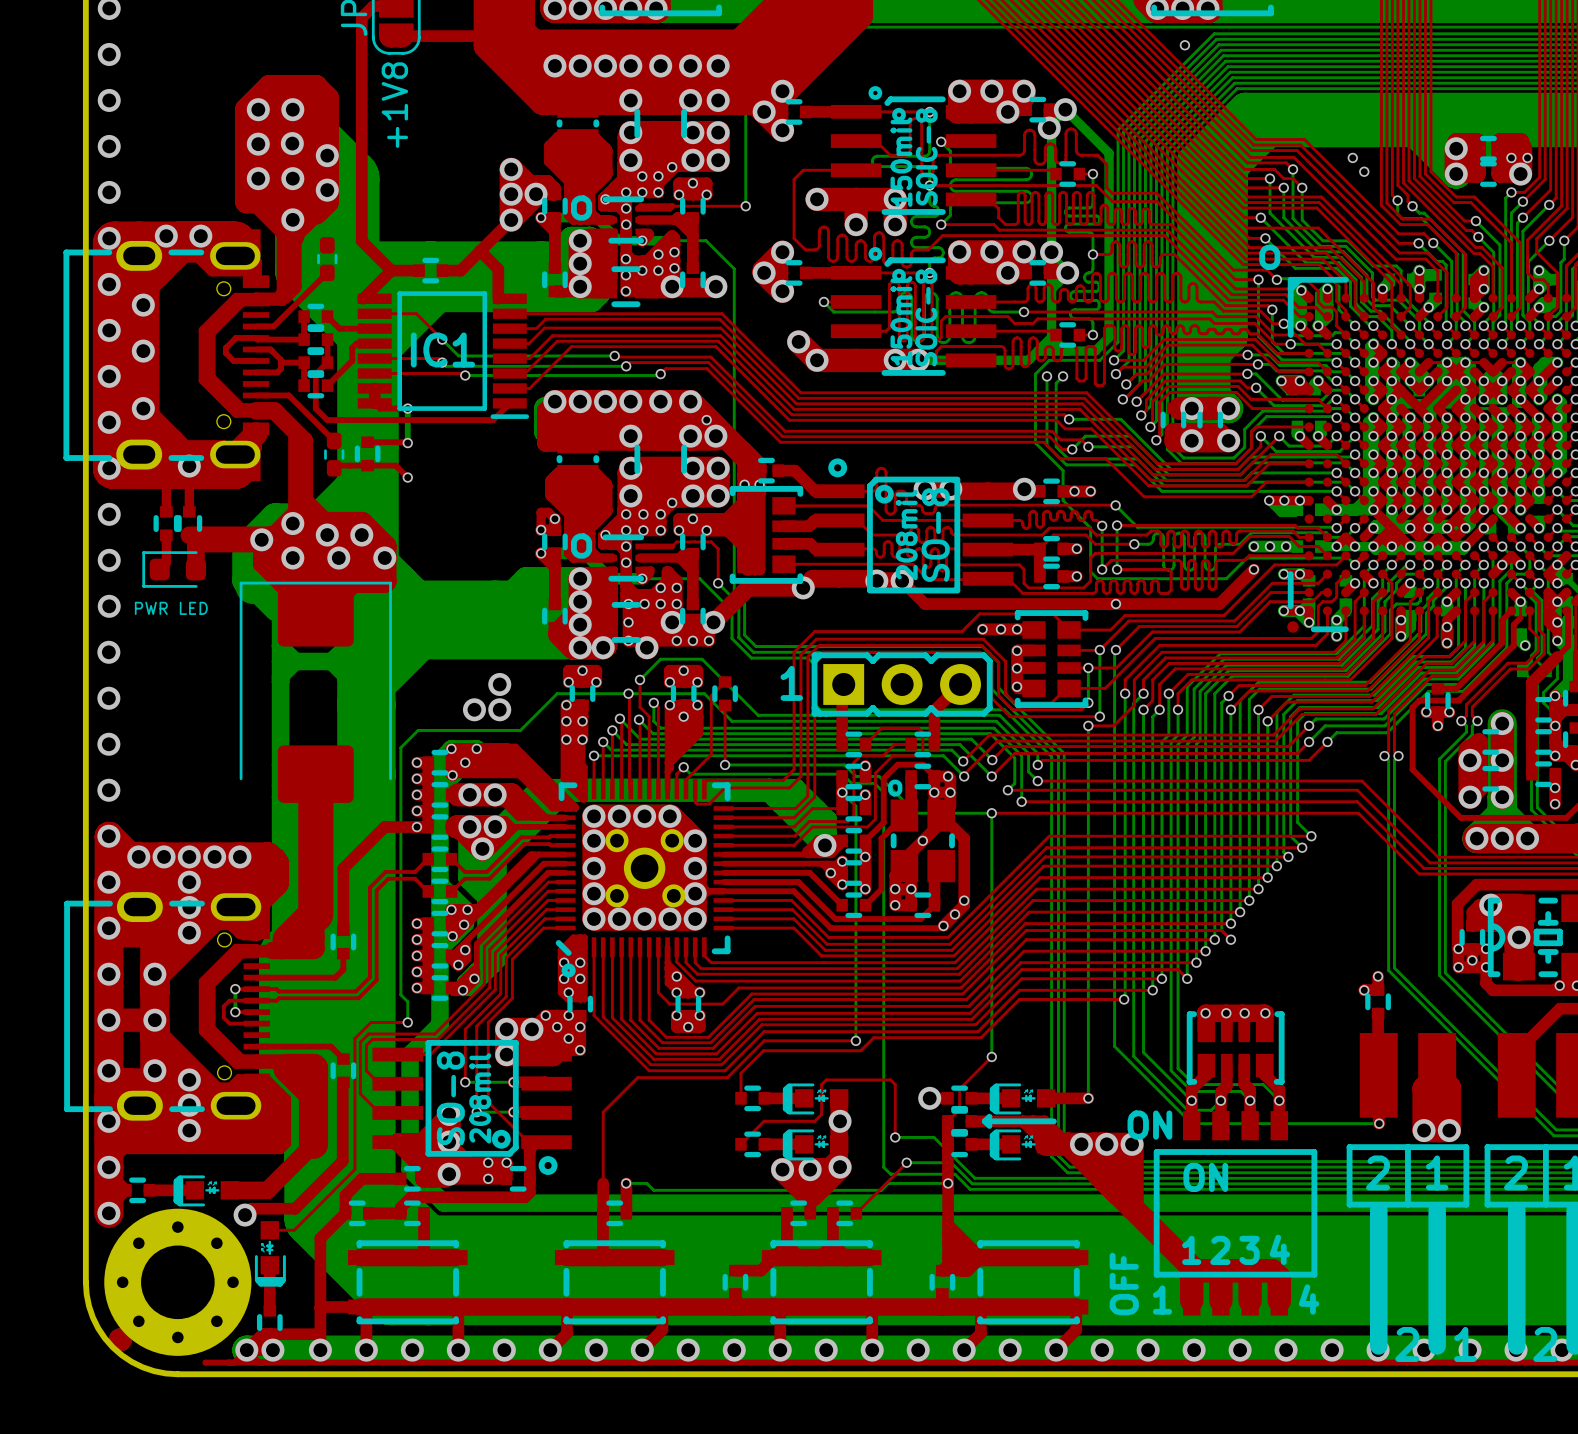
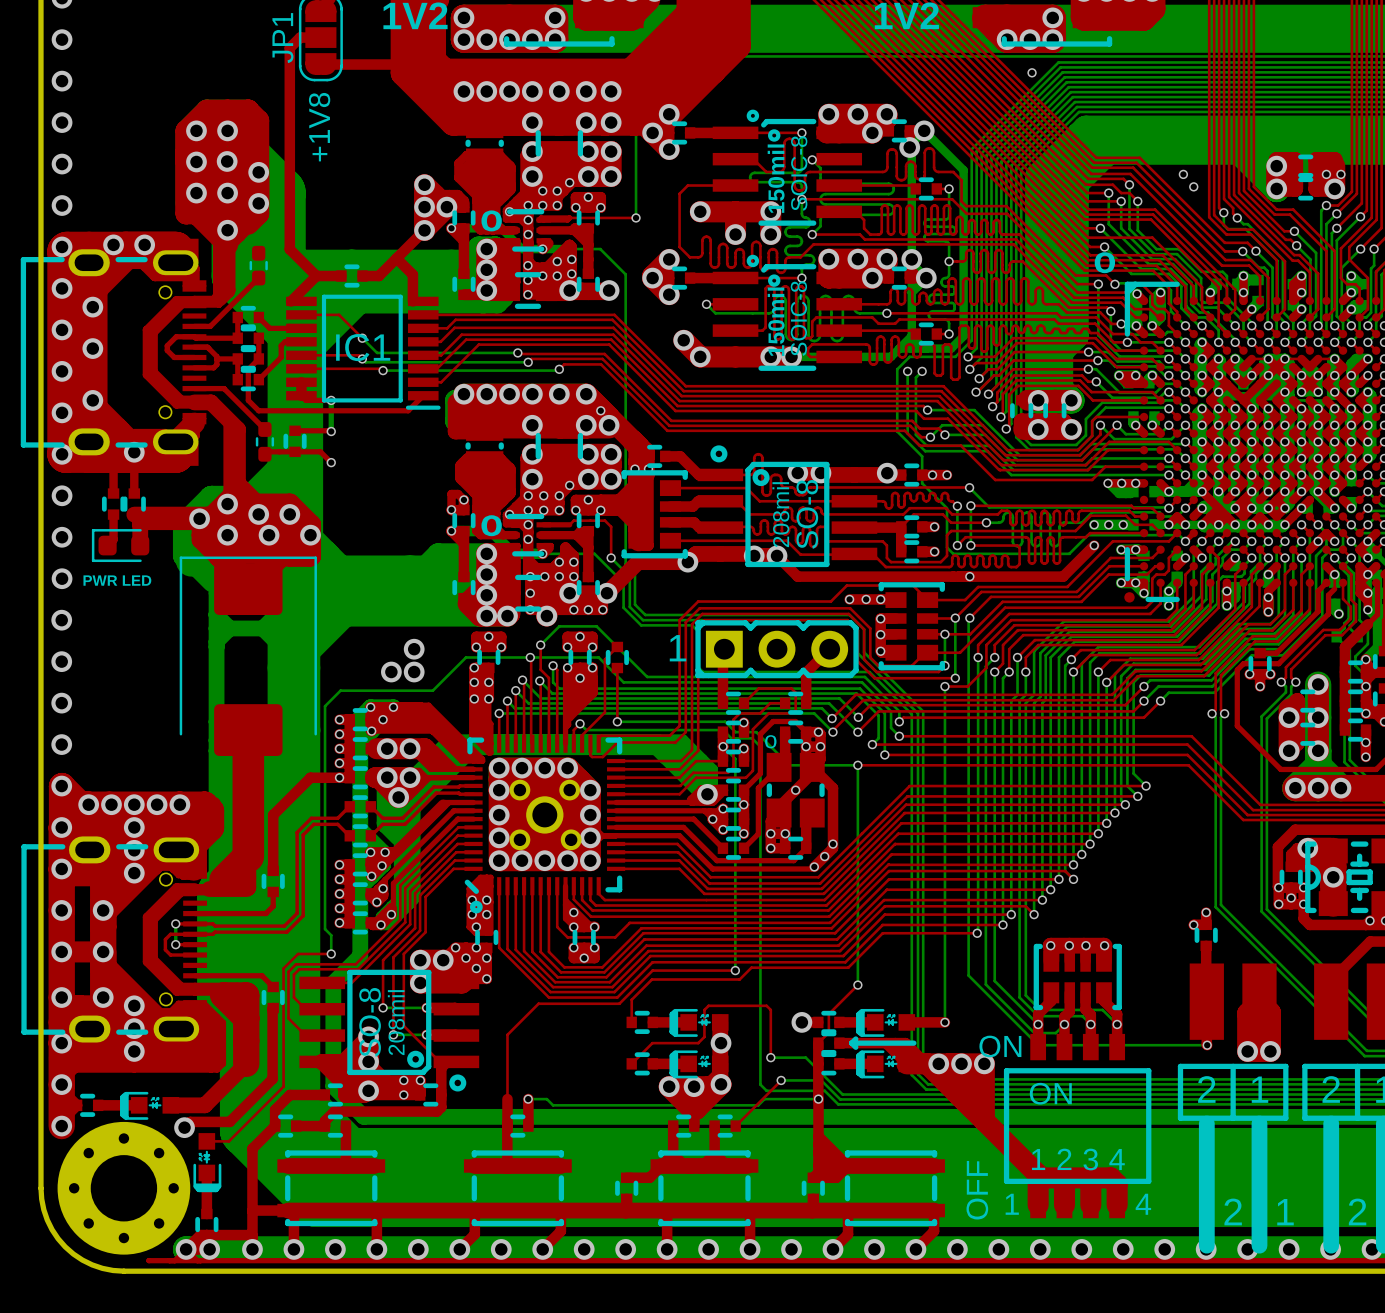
part: (120, 1339) -> none
text position: 2 (1407, 1344) -> 2 (1233, 1211)
text position: 1 (1465, 1344) -> 1 (1285, 1212)
text position: 2 (1545, 1344) -> 2 (1357, 1211)

